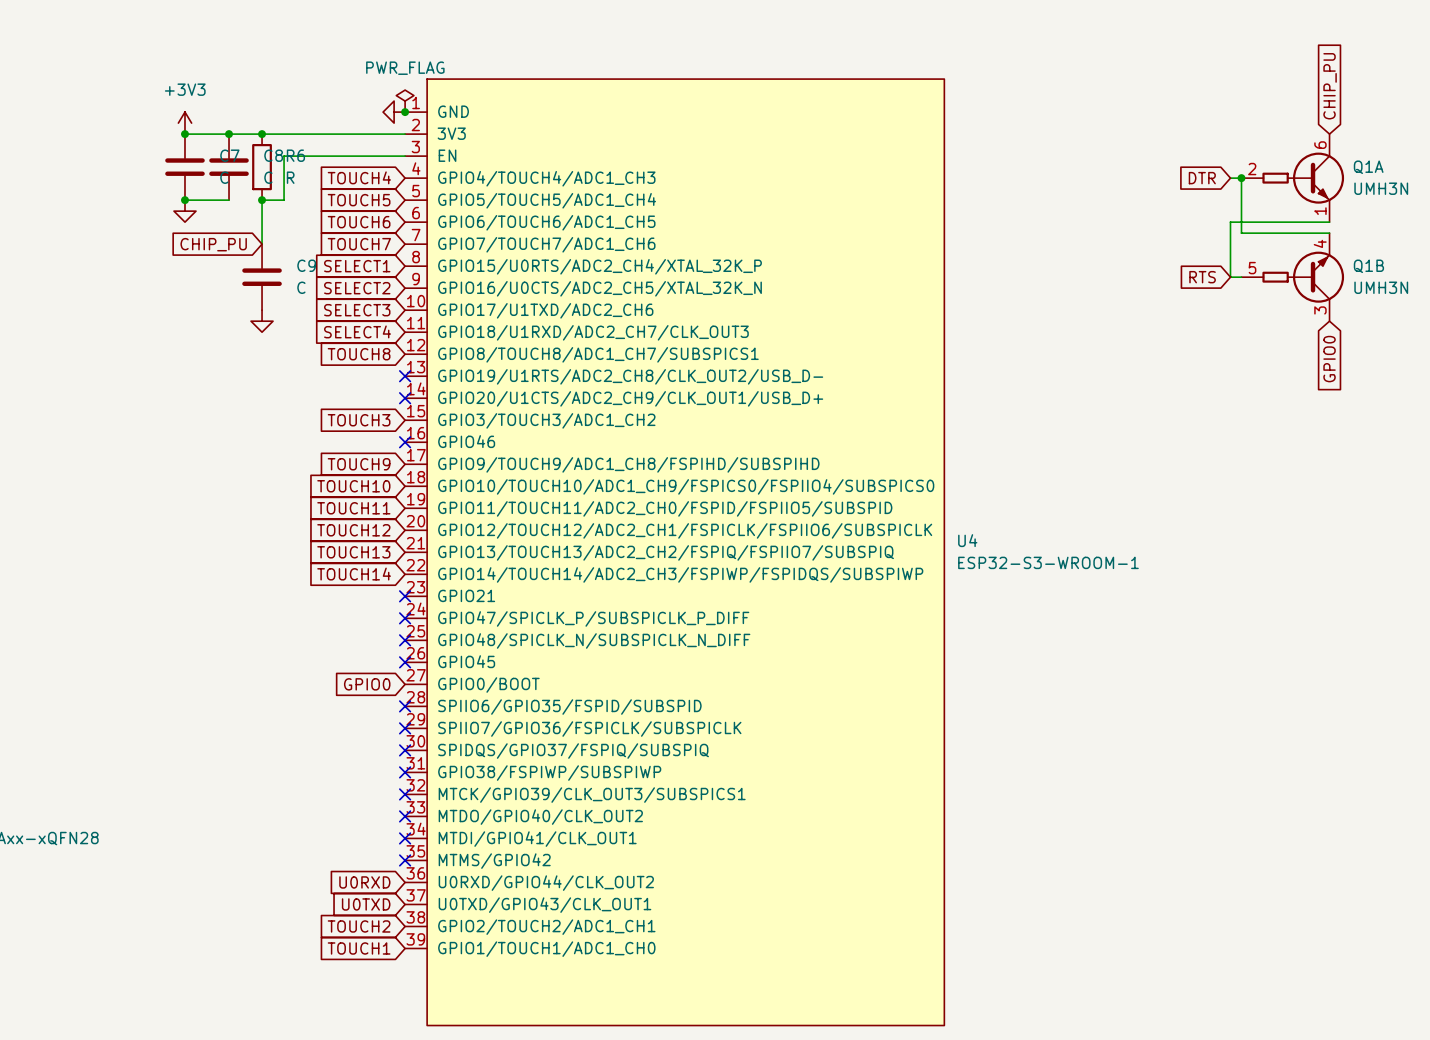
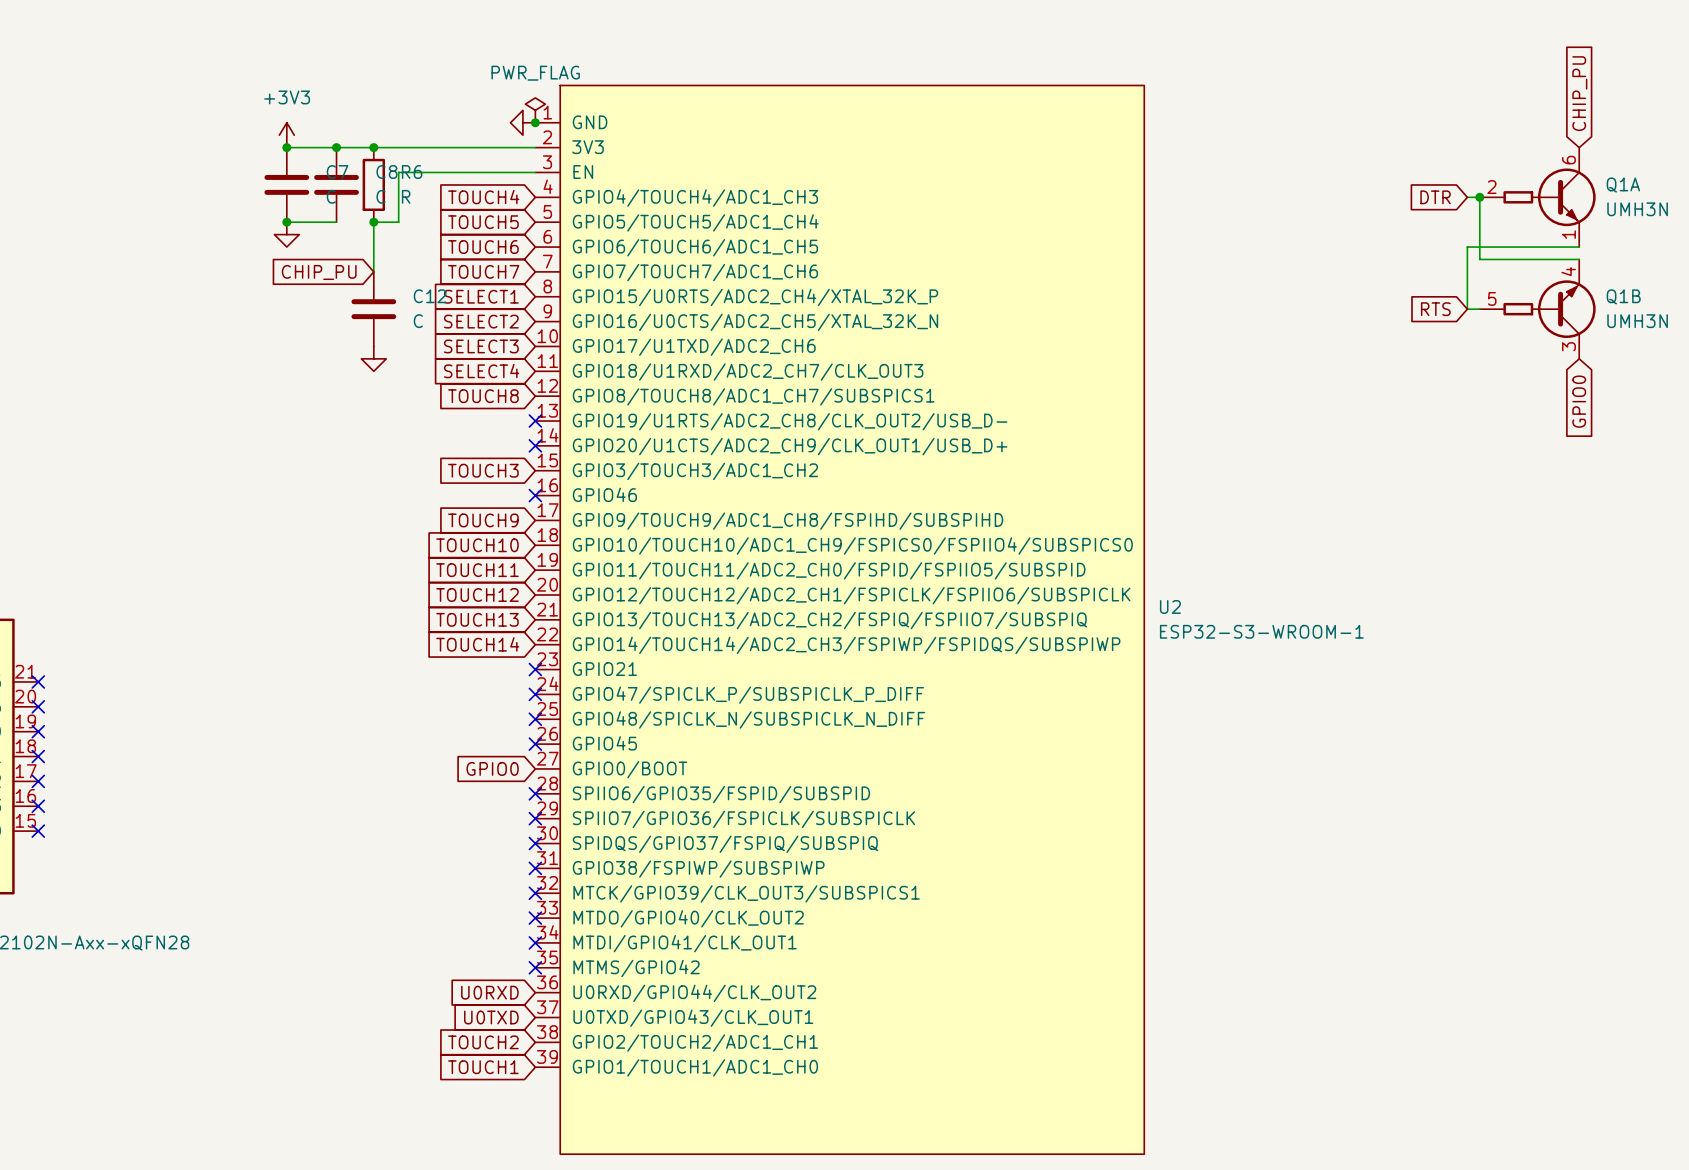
C9 name: C9 (306, 265) -> C12 (430, 296)
U4 name: U4 (967, 540) -> U2 (1170, 606)

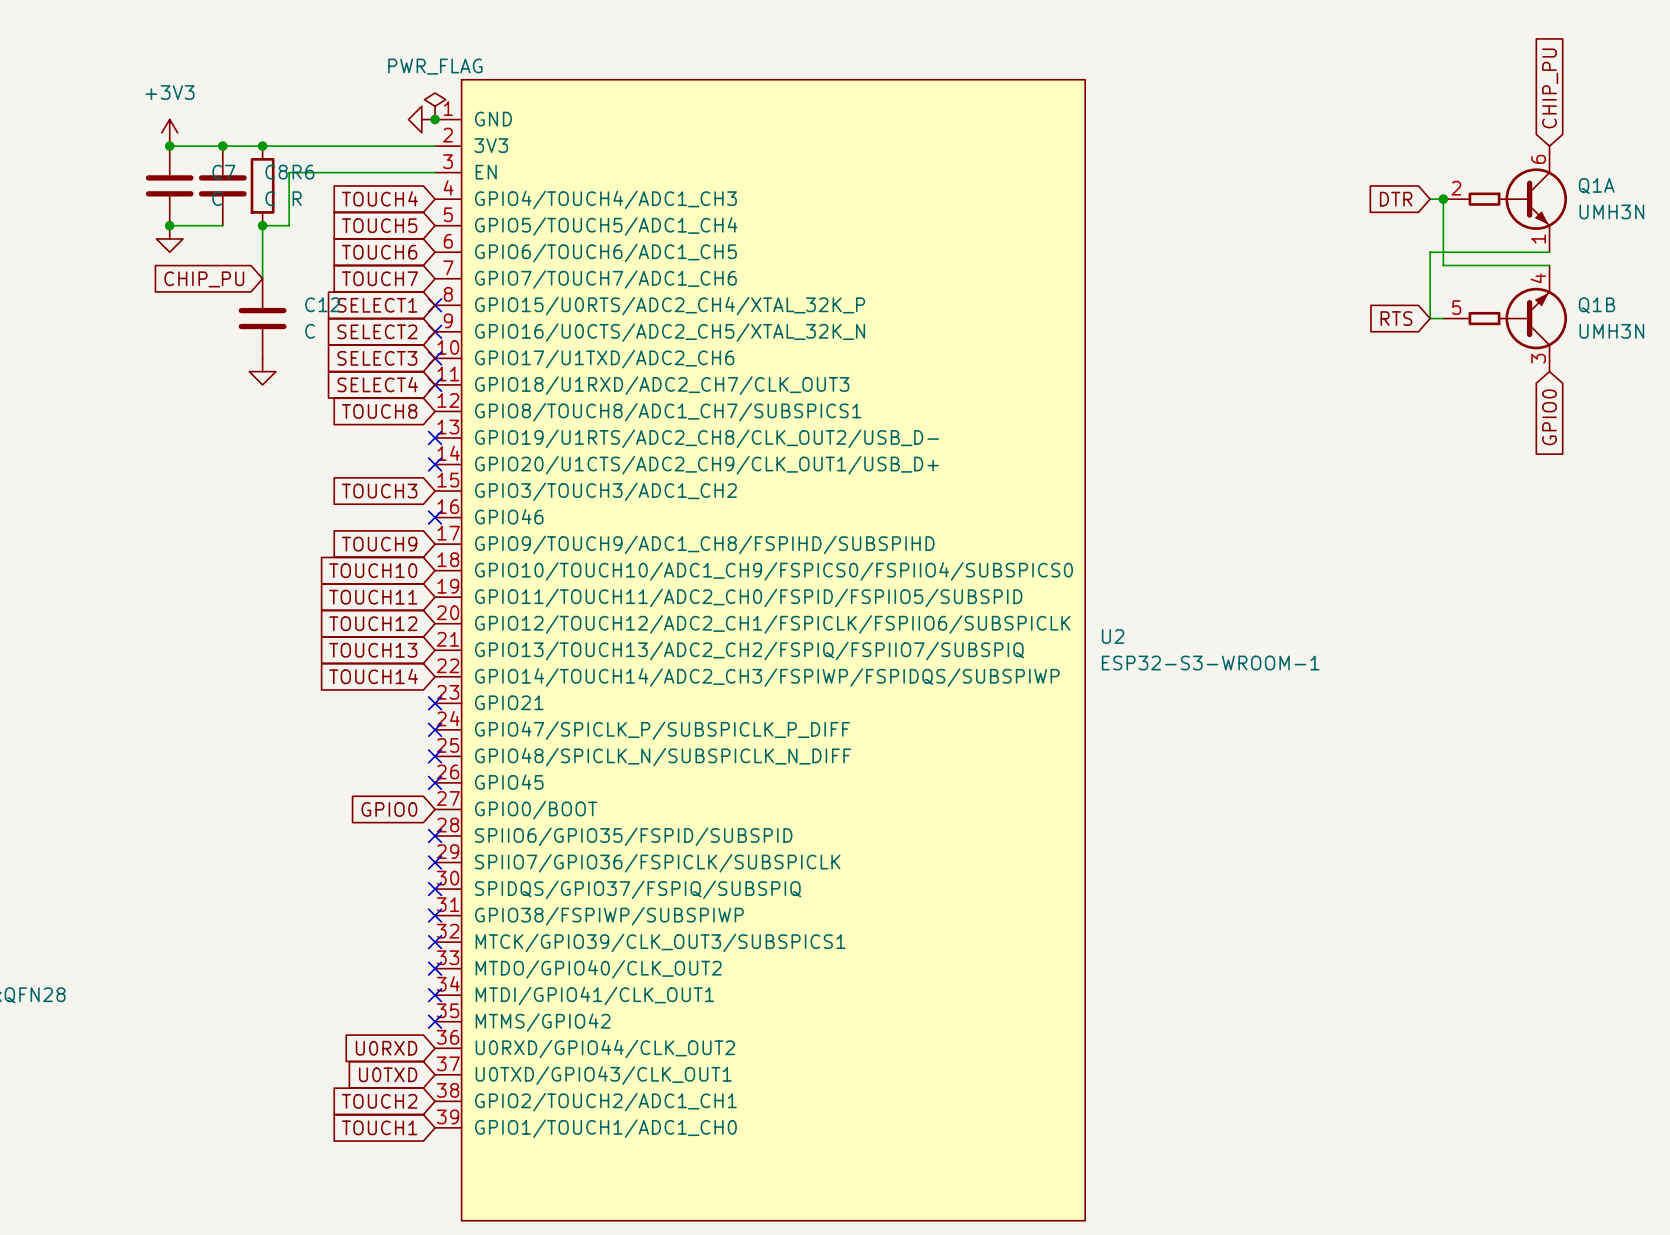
no-connect mark: none -> (435, 305)
no-connect mark: none -> (435, 331)
no-connect mark: none -> (435, 358)
no-connect mark: none -> (435, 384)

